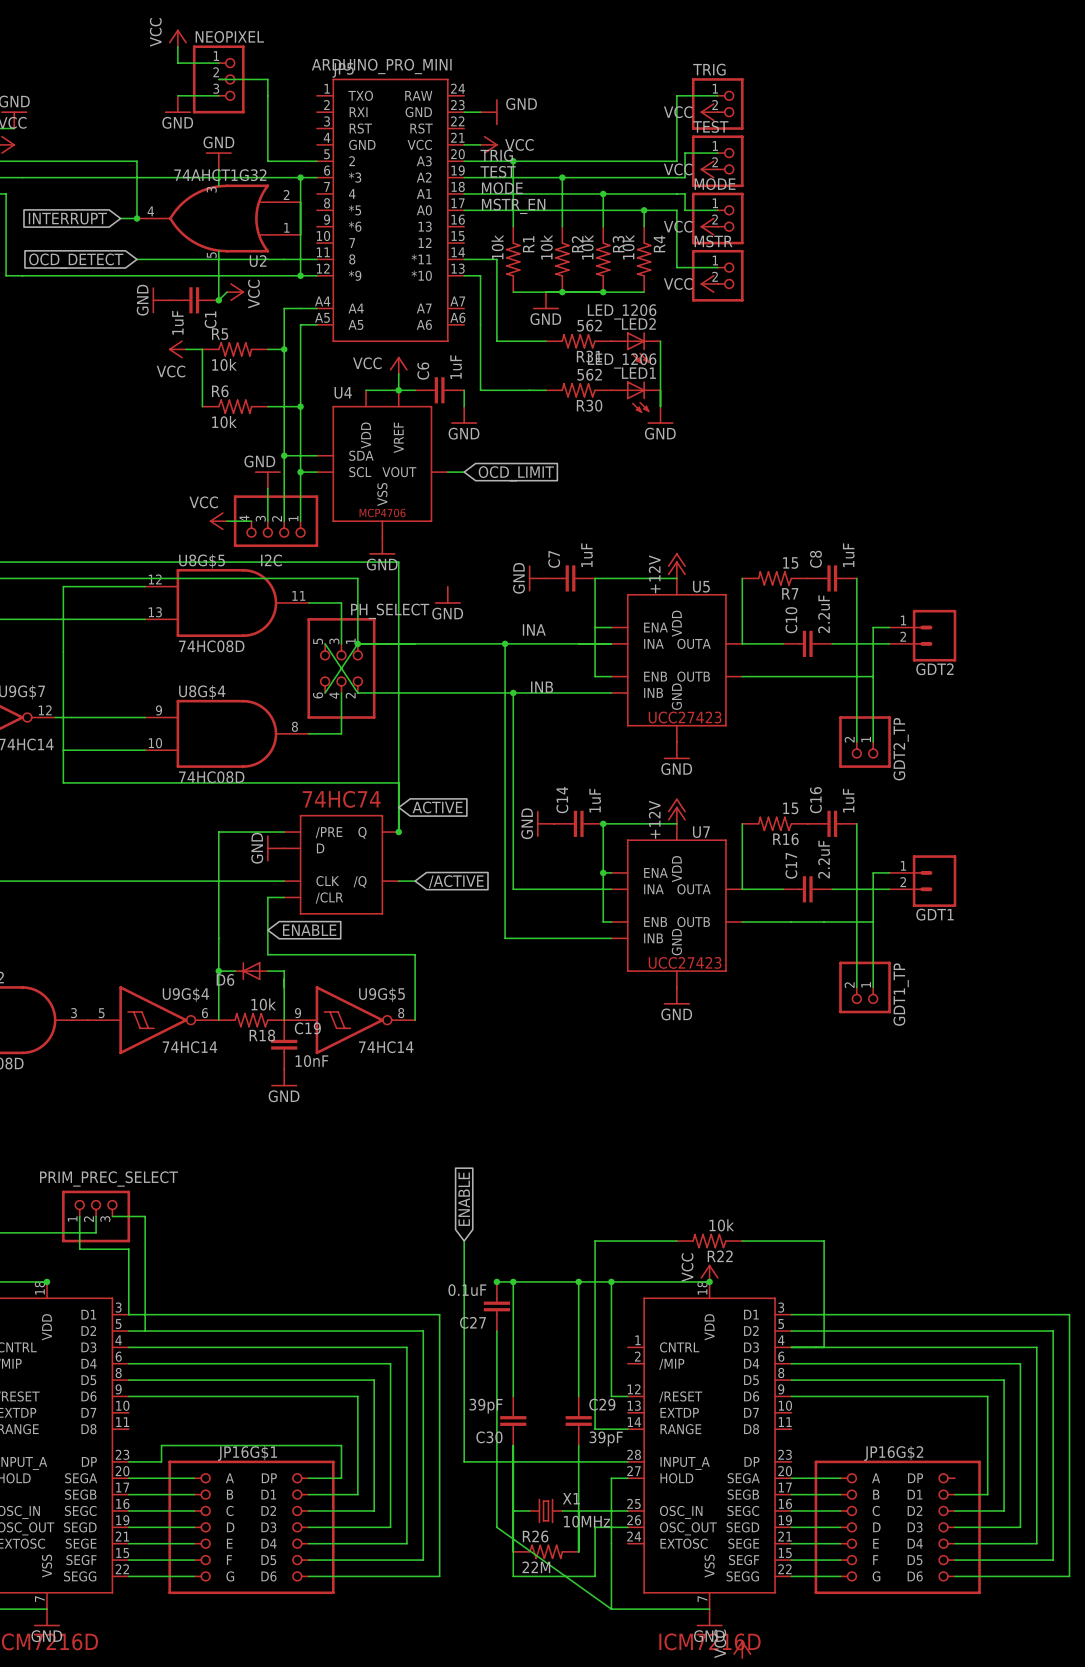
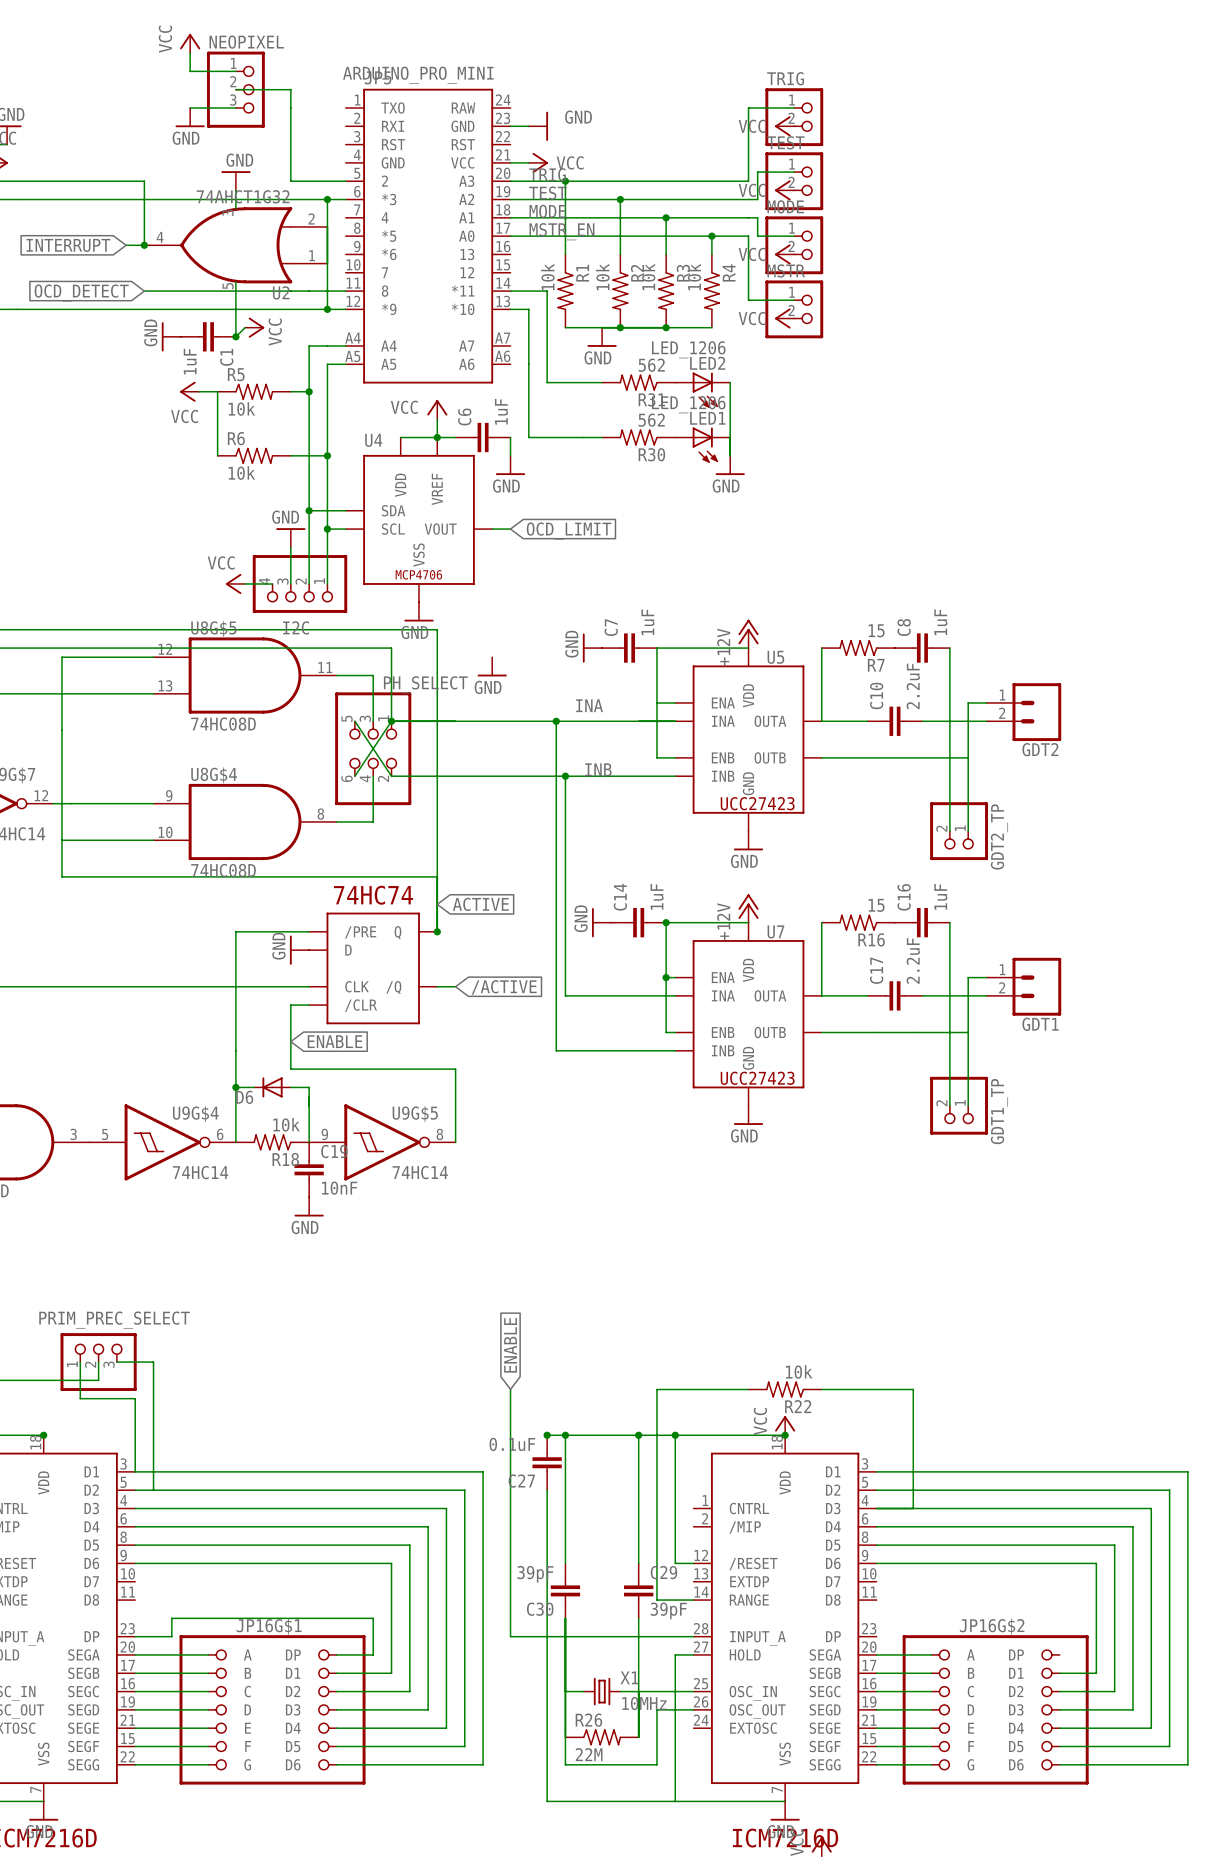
wire: (496, 1527) (611, 1609) -> (547, 1709) (547, 1801) (675, 1801)

